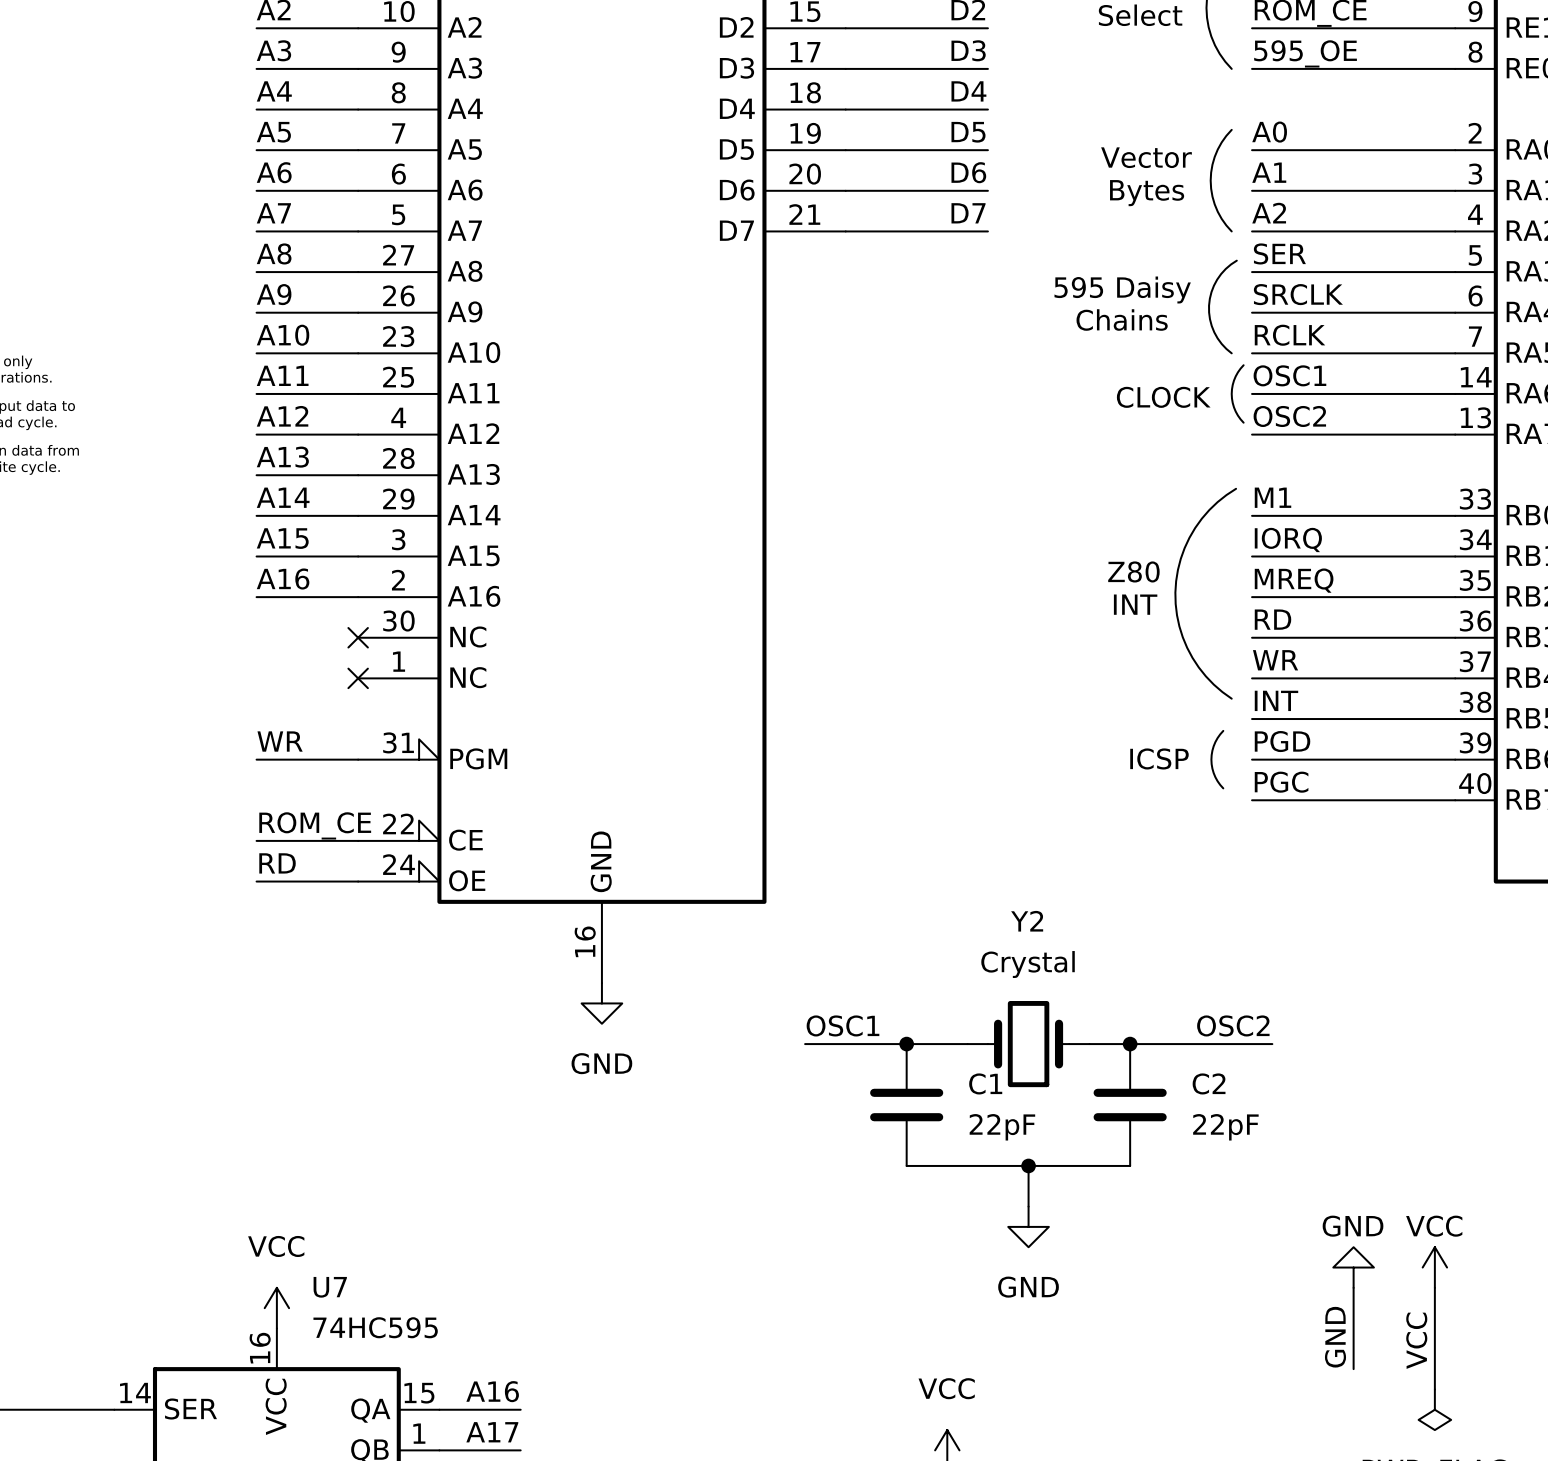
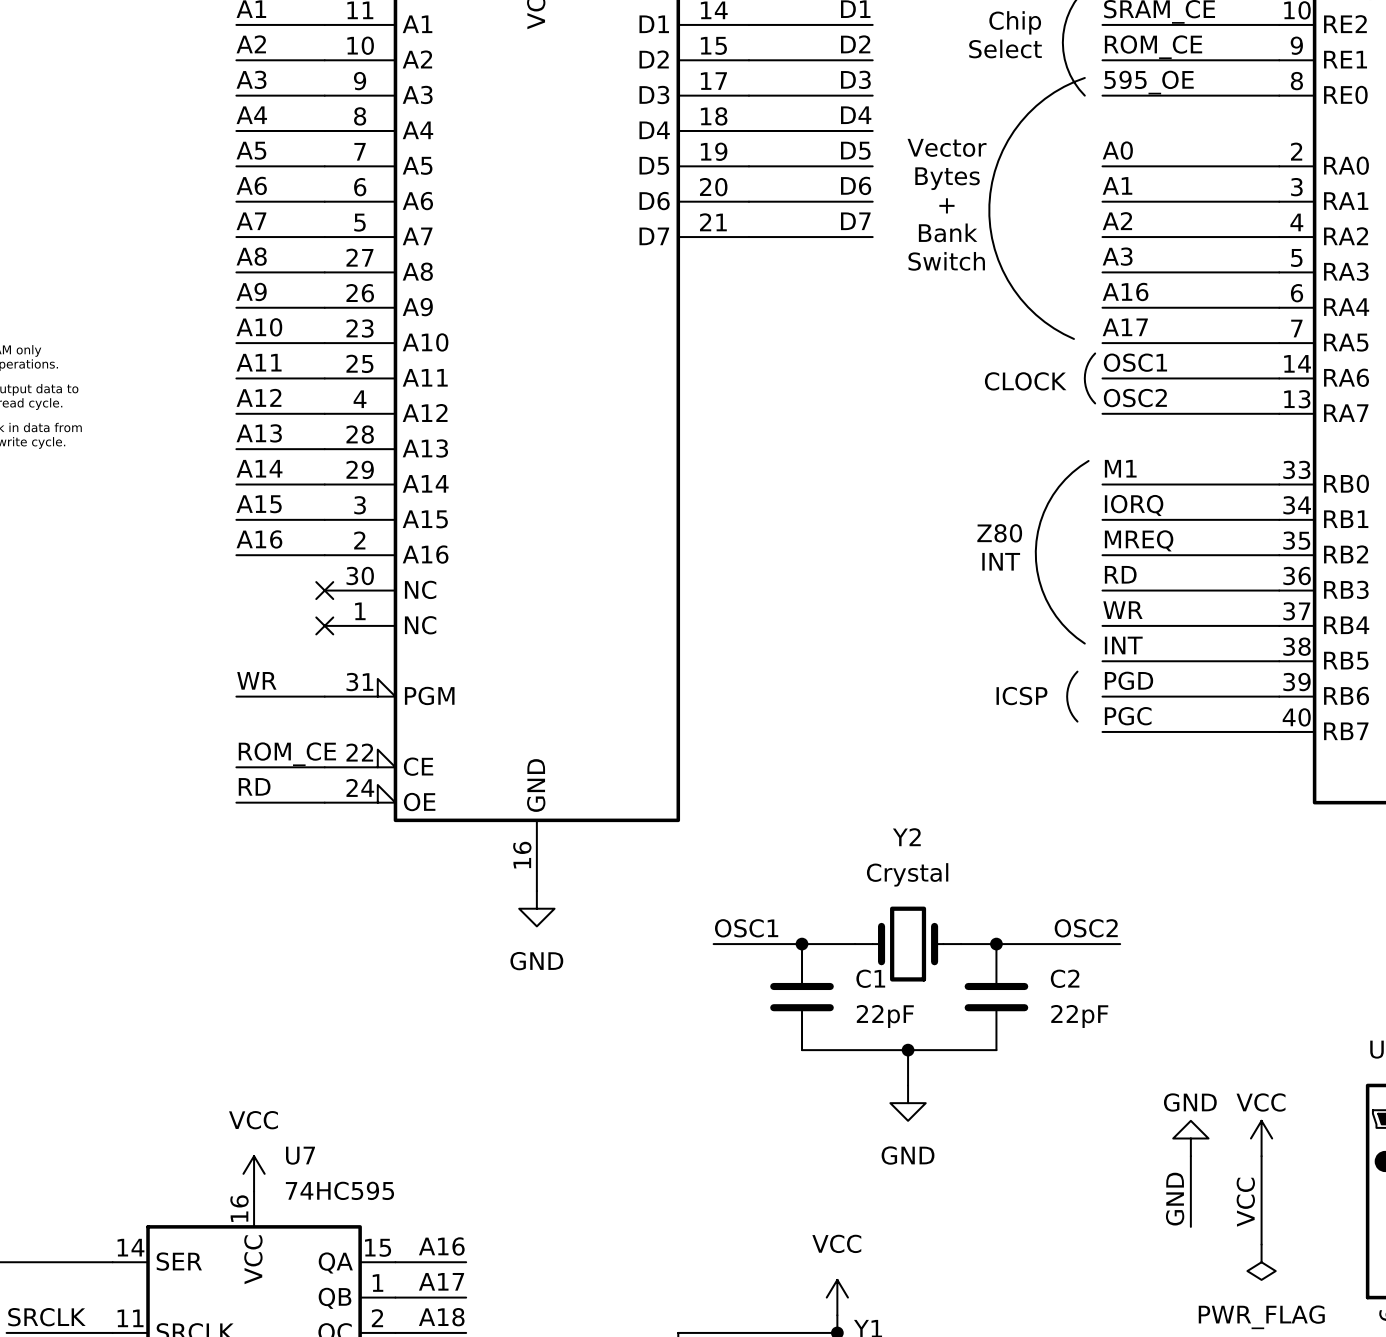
line: none -> (1084, 77) (1054, 92) (1036, 105) (1020, 122) (1008, 140) (998, 160) (992, 182) (989, 204) (990, 227) (994, 249) (1007, 280) (1020, 298) (1036, 314) (1054, 328) (1073, 338)
line: (1231, 129) (1217, 149) (1212, 164) (1210, 180) (1214, 204) (1221, 218) (1231, 231) -> none
text position: Vector (1146, 157) -> Vector (947, 147)
text position: Bytes (1147, 193) -> Bytes (947, 178)
text: none -> + (946, 205)
text: none -> Bank (948, 232)
label: SER (1279, 253) -> A3 (1117, 256)
text: none -> Switch (946, 261)
line: (1236, 260) (1225, 268) (1217, 279) (1211, 292) (1209, 305) (1210, 319) (1214, 332) (1221, 343) (1231, 353) -> none
text: 595 Daisy (1122, 290) -> none
label: SRCLK (1298, 294) -> A16 (1125, 291)
text: Chains (1122, 320) -> none
label: RCLK (1290, 335) -> A17 (1125, 327)

